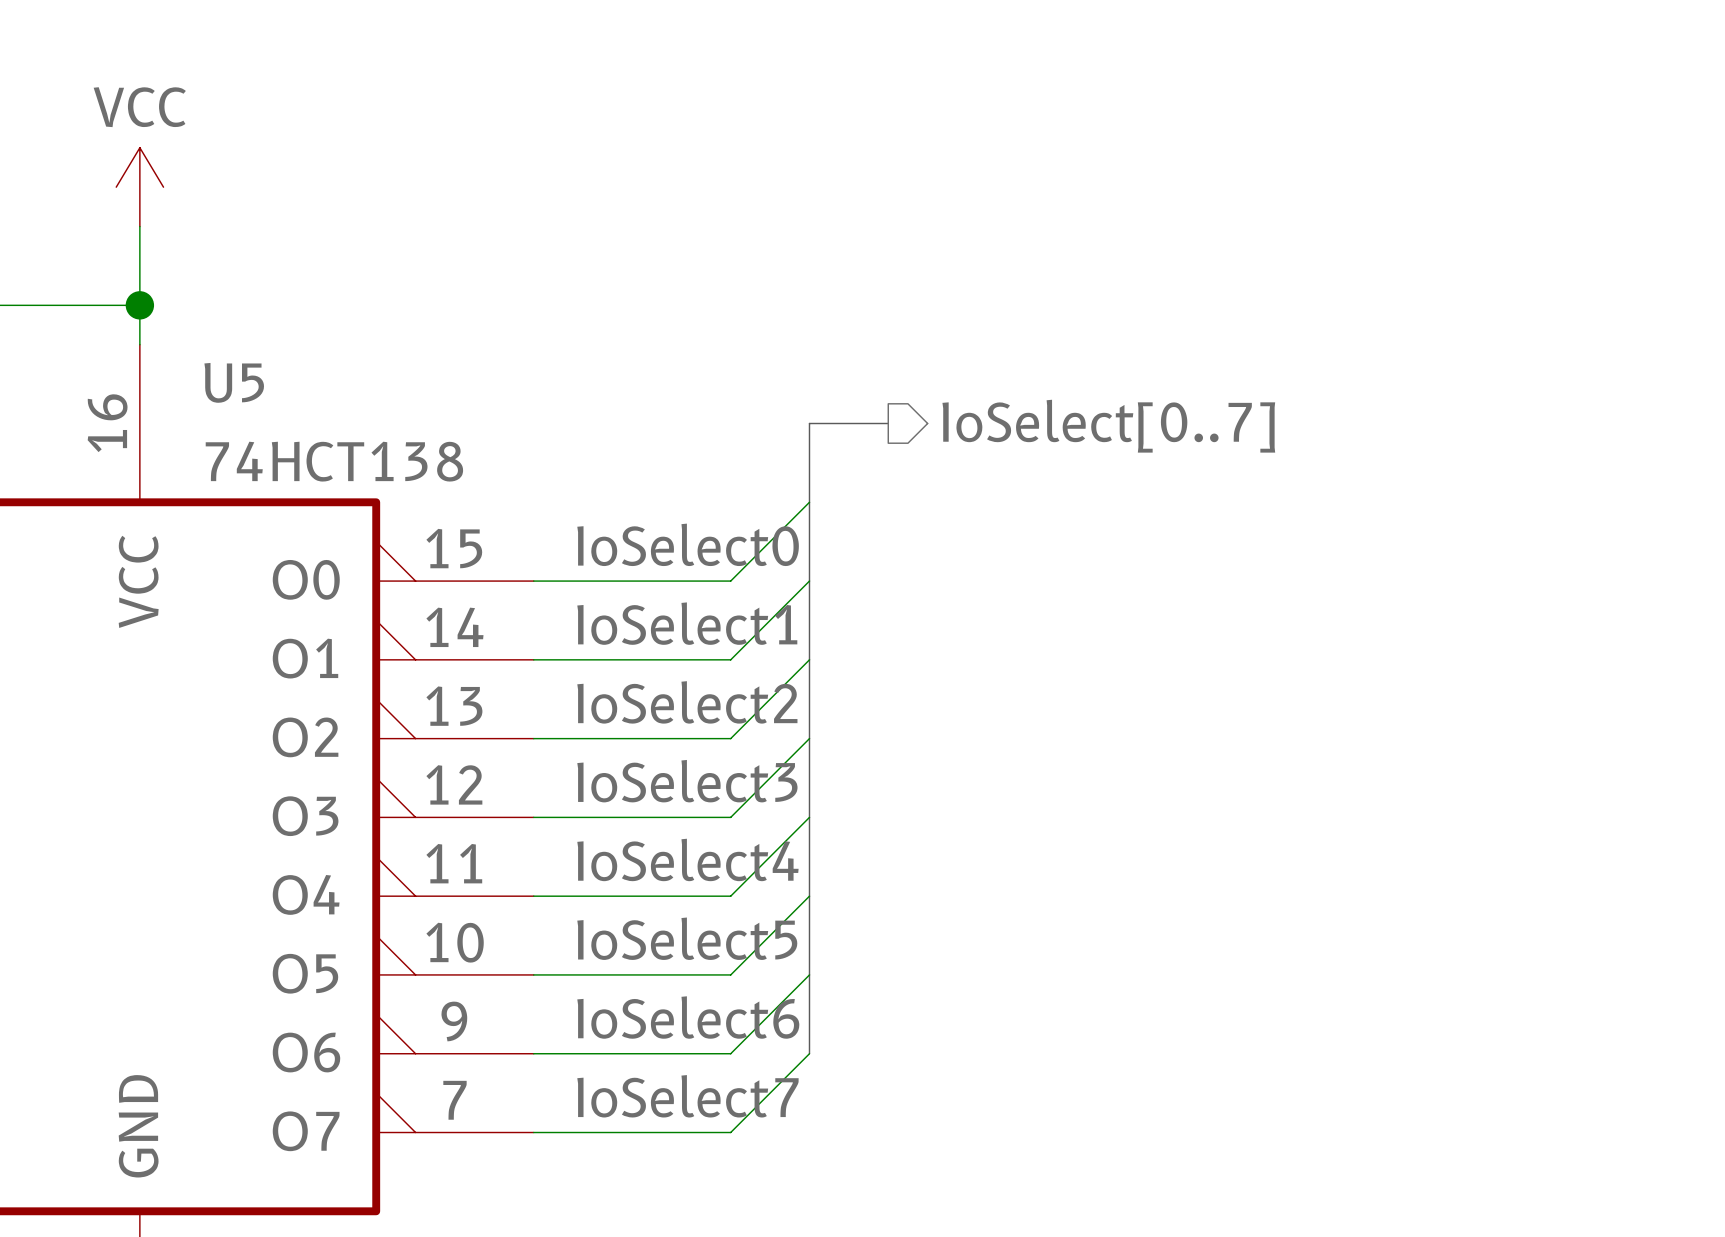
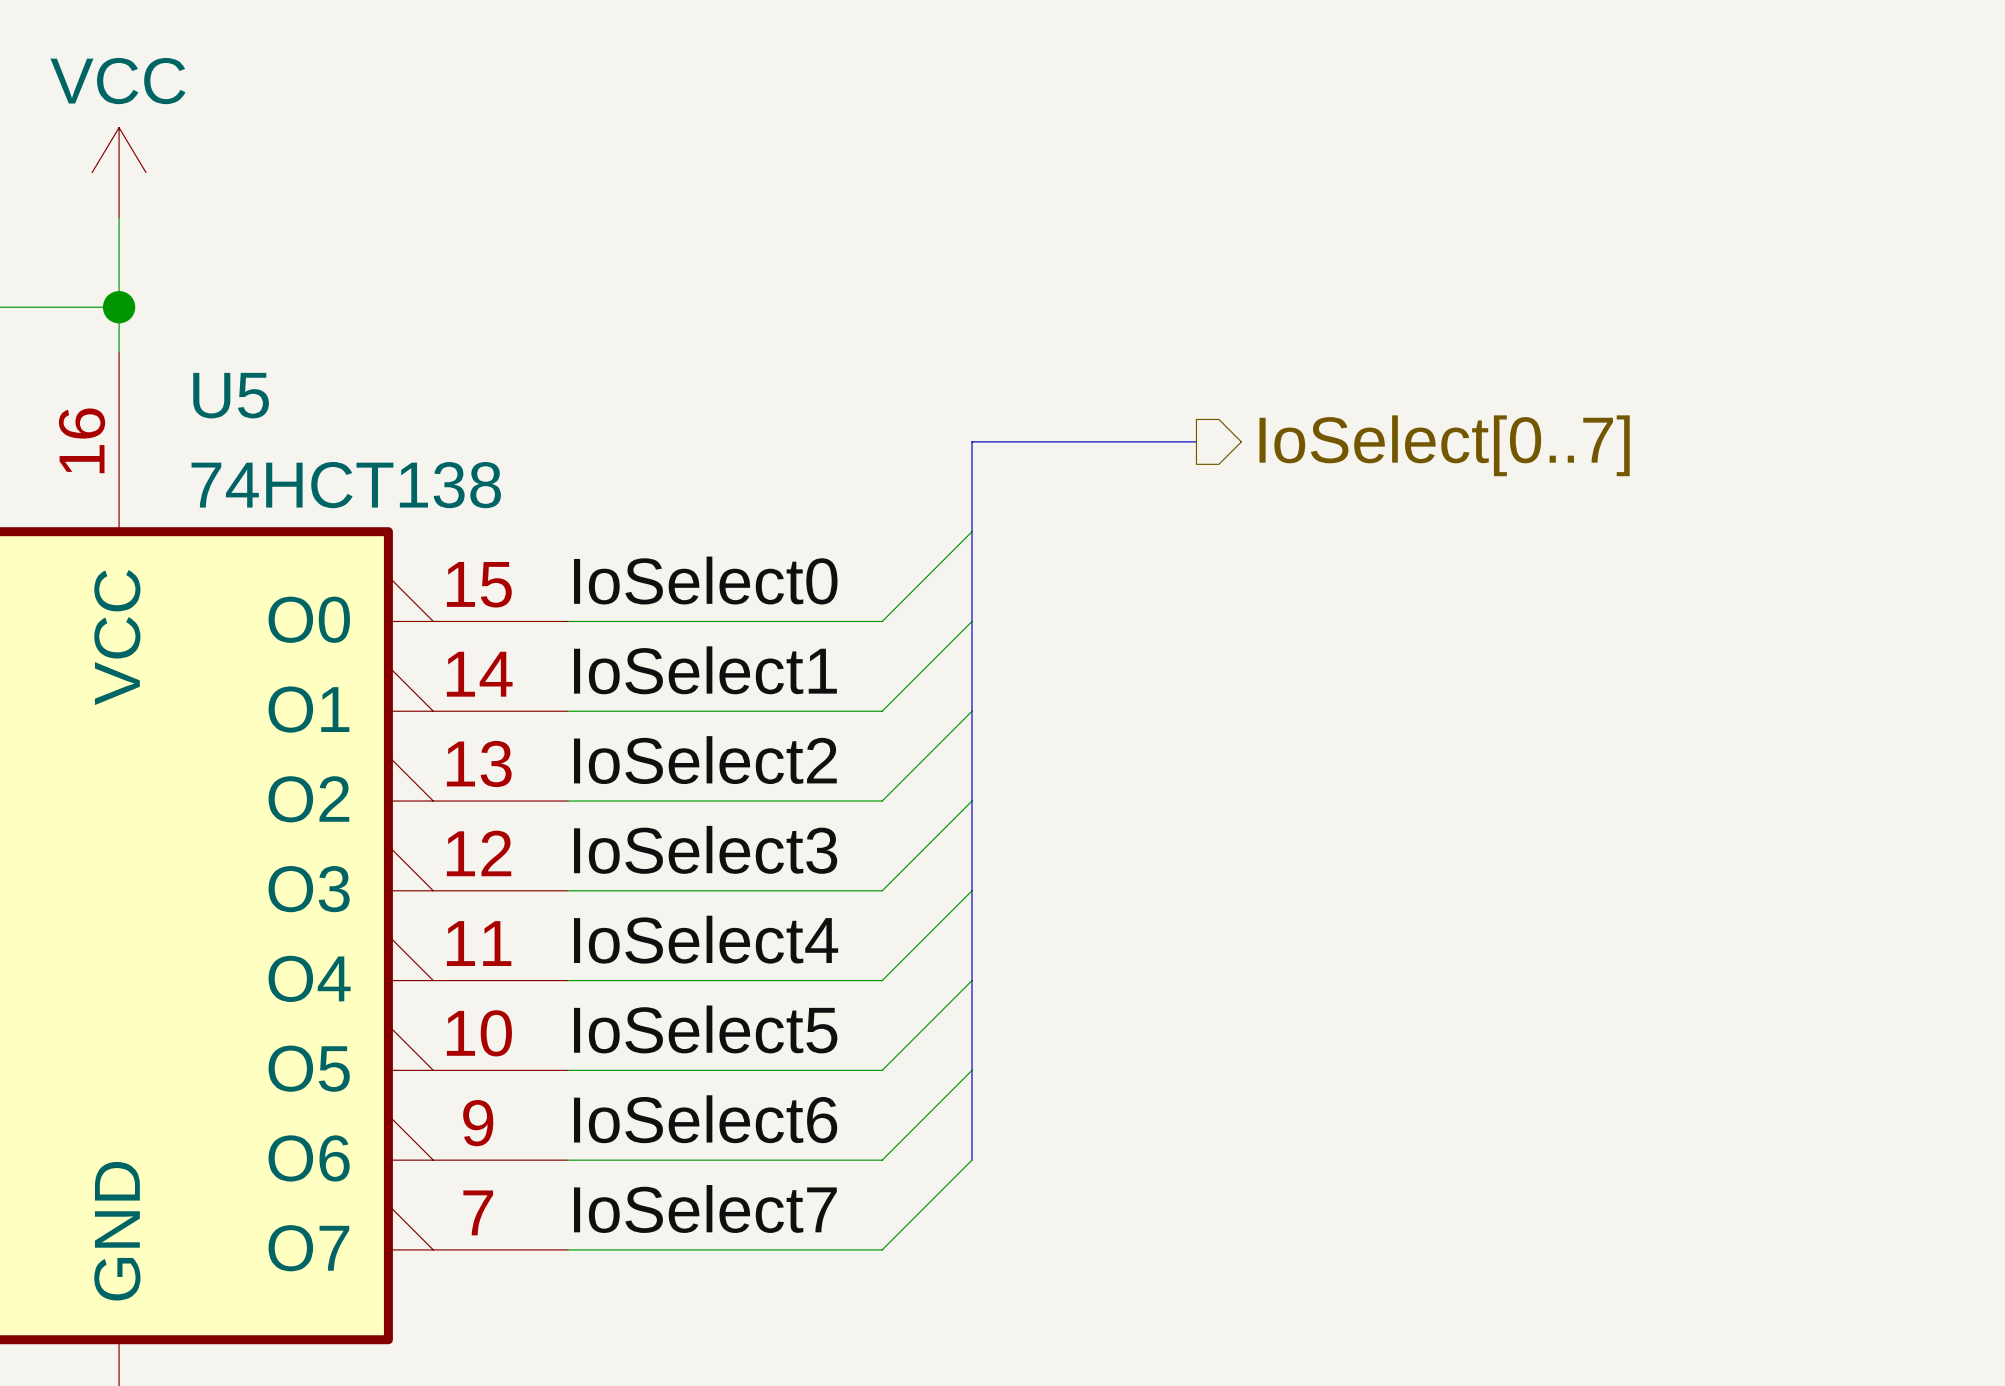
bus: (888, 423) (809, 423) (809, 1053) -> none
bus: none -> (1196, 441) (972, 441) (972, 1160)
hierarchical label position: IoSelect[0..7] (1108, 426) -> IoSelect[0..7] (1444, 445)
wire: (809, 502) (730, 581) -> (972, 531) (882, 621) (792, 621)
label position: IoSelect0 (688, 544) -> IoSelect0 (705, 580)
wire: (809, 581) (730, 659) -> (972, 621) (882, 711) (792, 711)
label position: IoSelect1 (687, 623) -> IoSelect1 (705, 670)
wire: (809, 659) (730, 738) -> (972, 711) (882, 801) (792, 801)
label position: IoSelect2 (687, 702) -> IoSelect2 (705, 760)
wire: (809, 738) (730, 817) -> (972, 801) (882, 890) (792, 890)
label position: IoSelect3 (687, 781) -> IoSelect3 (705, 849)
wire: (809, 817) (730, 896) -> (972, 890) (882, 980) (792, 980)
label position: IoSelect4 (687, 859) -> IoSelect4 (706, 939)
wire: (809, 896) (730, 974) -> (972, 980) (882, 1070) (792, 1070)
label position: IoSelect5 (687, 938) -> IoSelect5 (705, 1029)
wire: (809, 974) (730, 1053) -> (972, 1070) (882, 1160) (792, 1160)
label position: IoSelect6 (688, 1017) -> IoSelect6 (705, 1119)
wire: (809, 1053) (730, 1132) -> (972, 1160) (882, 1249) (792, 1249)
label position: IoSelect7 (687, 1096) -> IoSelect7 (705, 1209)

